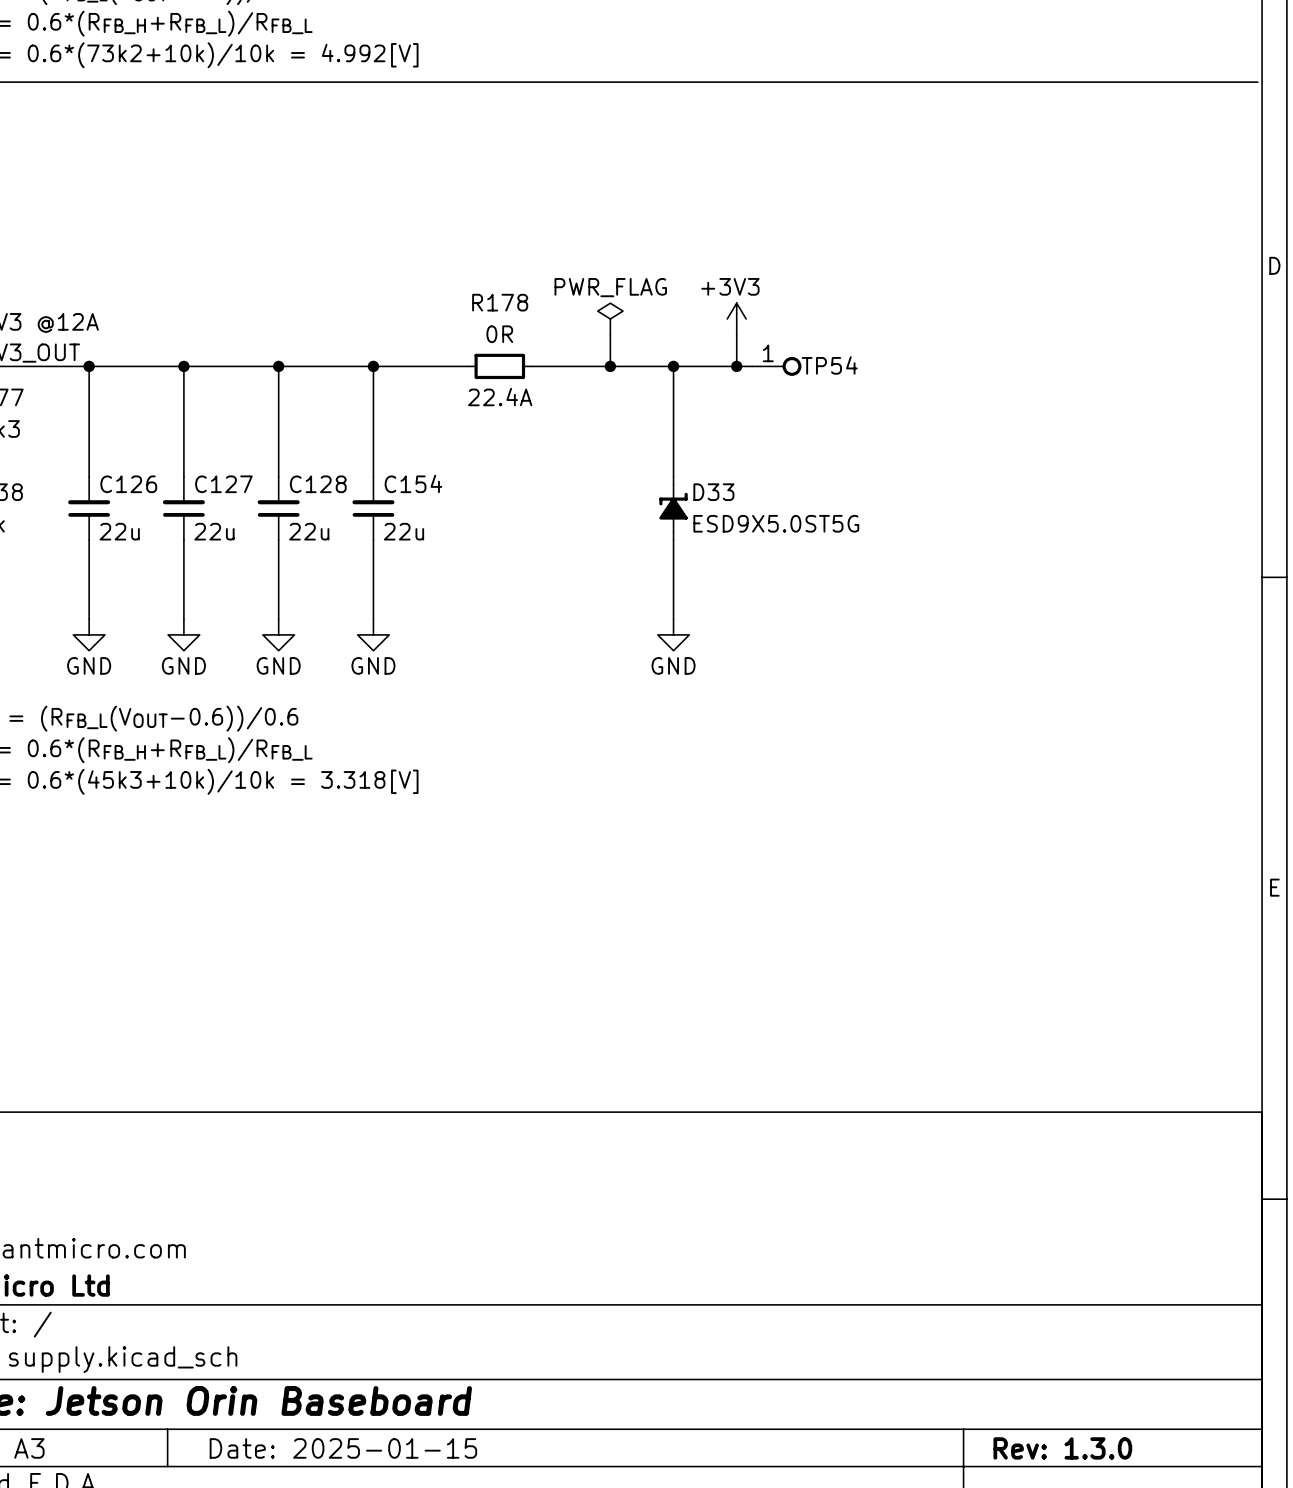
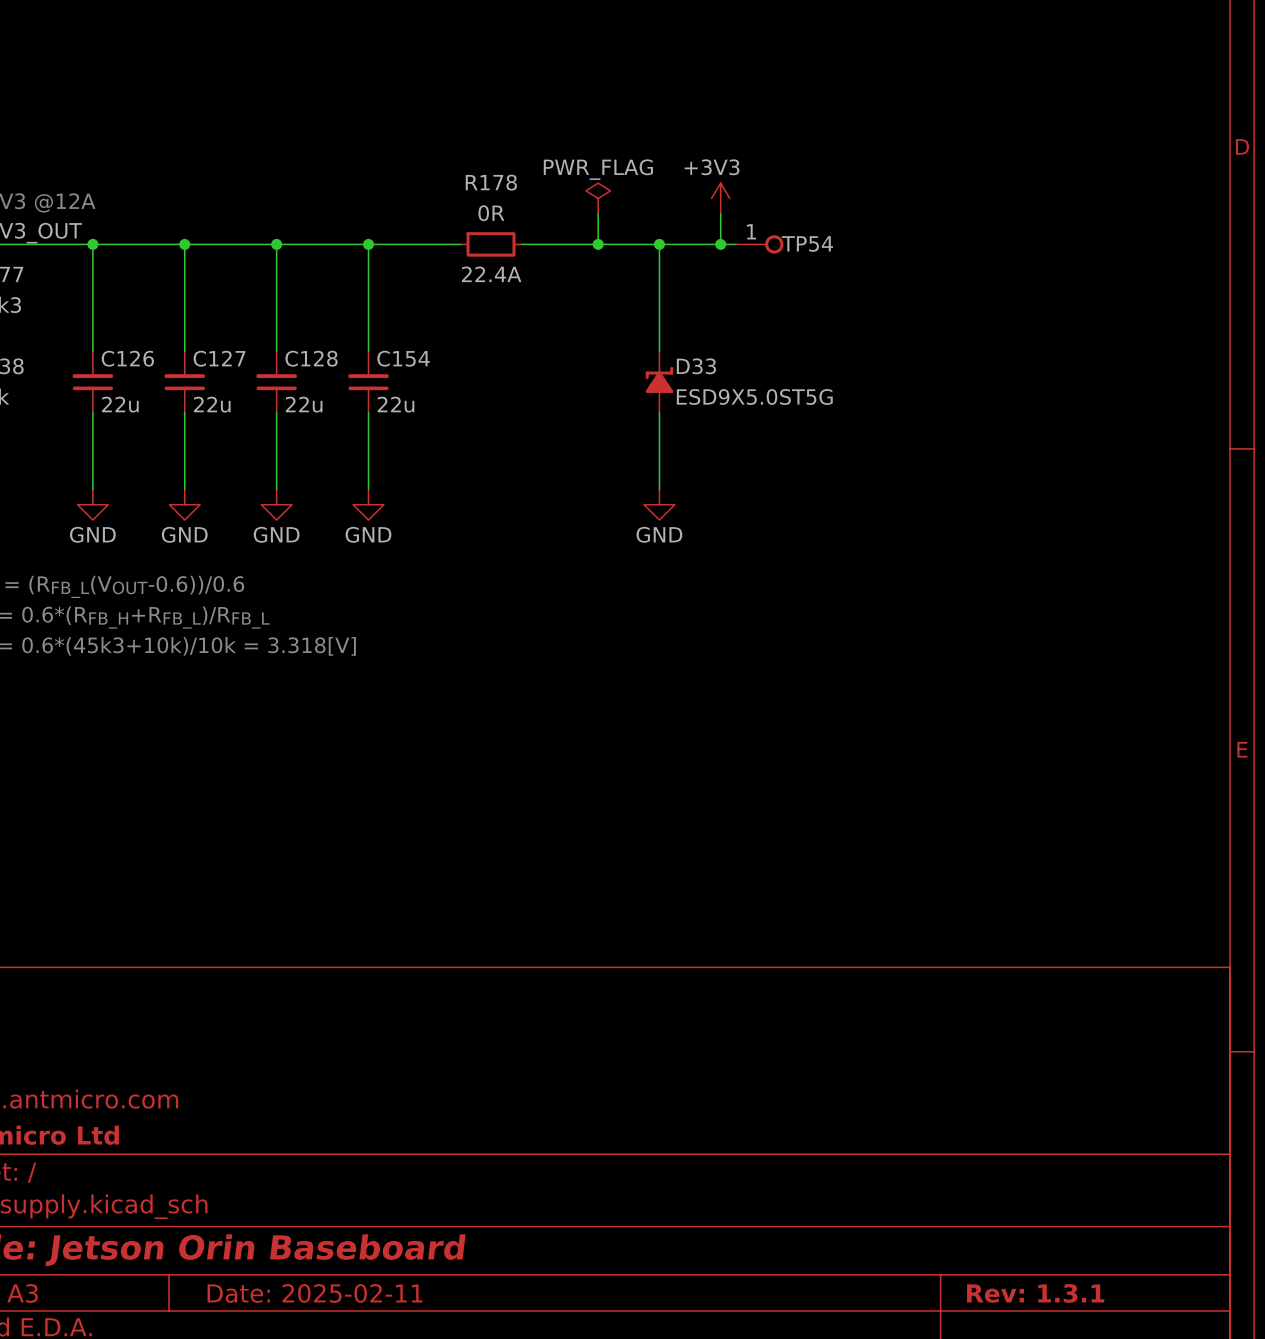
title block: Date: 2025-01-15 (343, 1448) -> Date: 2025-02-11 (315, 1293)
title block: Rev: 1.3.0 (1062, 1448) -> Rev: 1.3.1 (1035, 1293)

